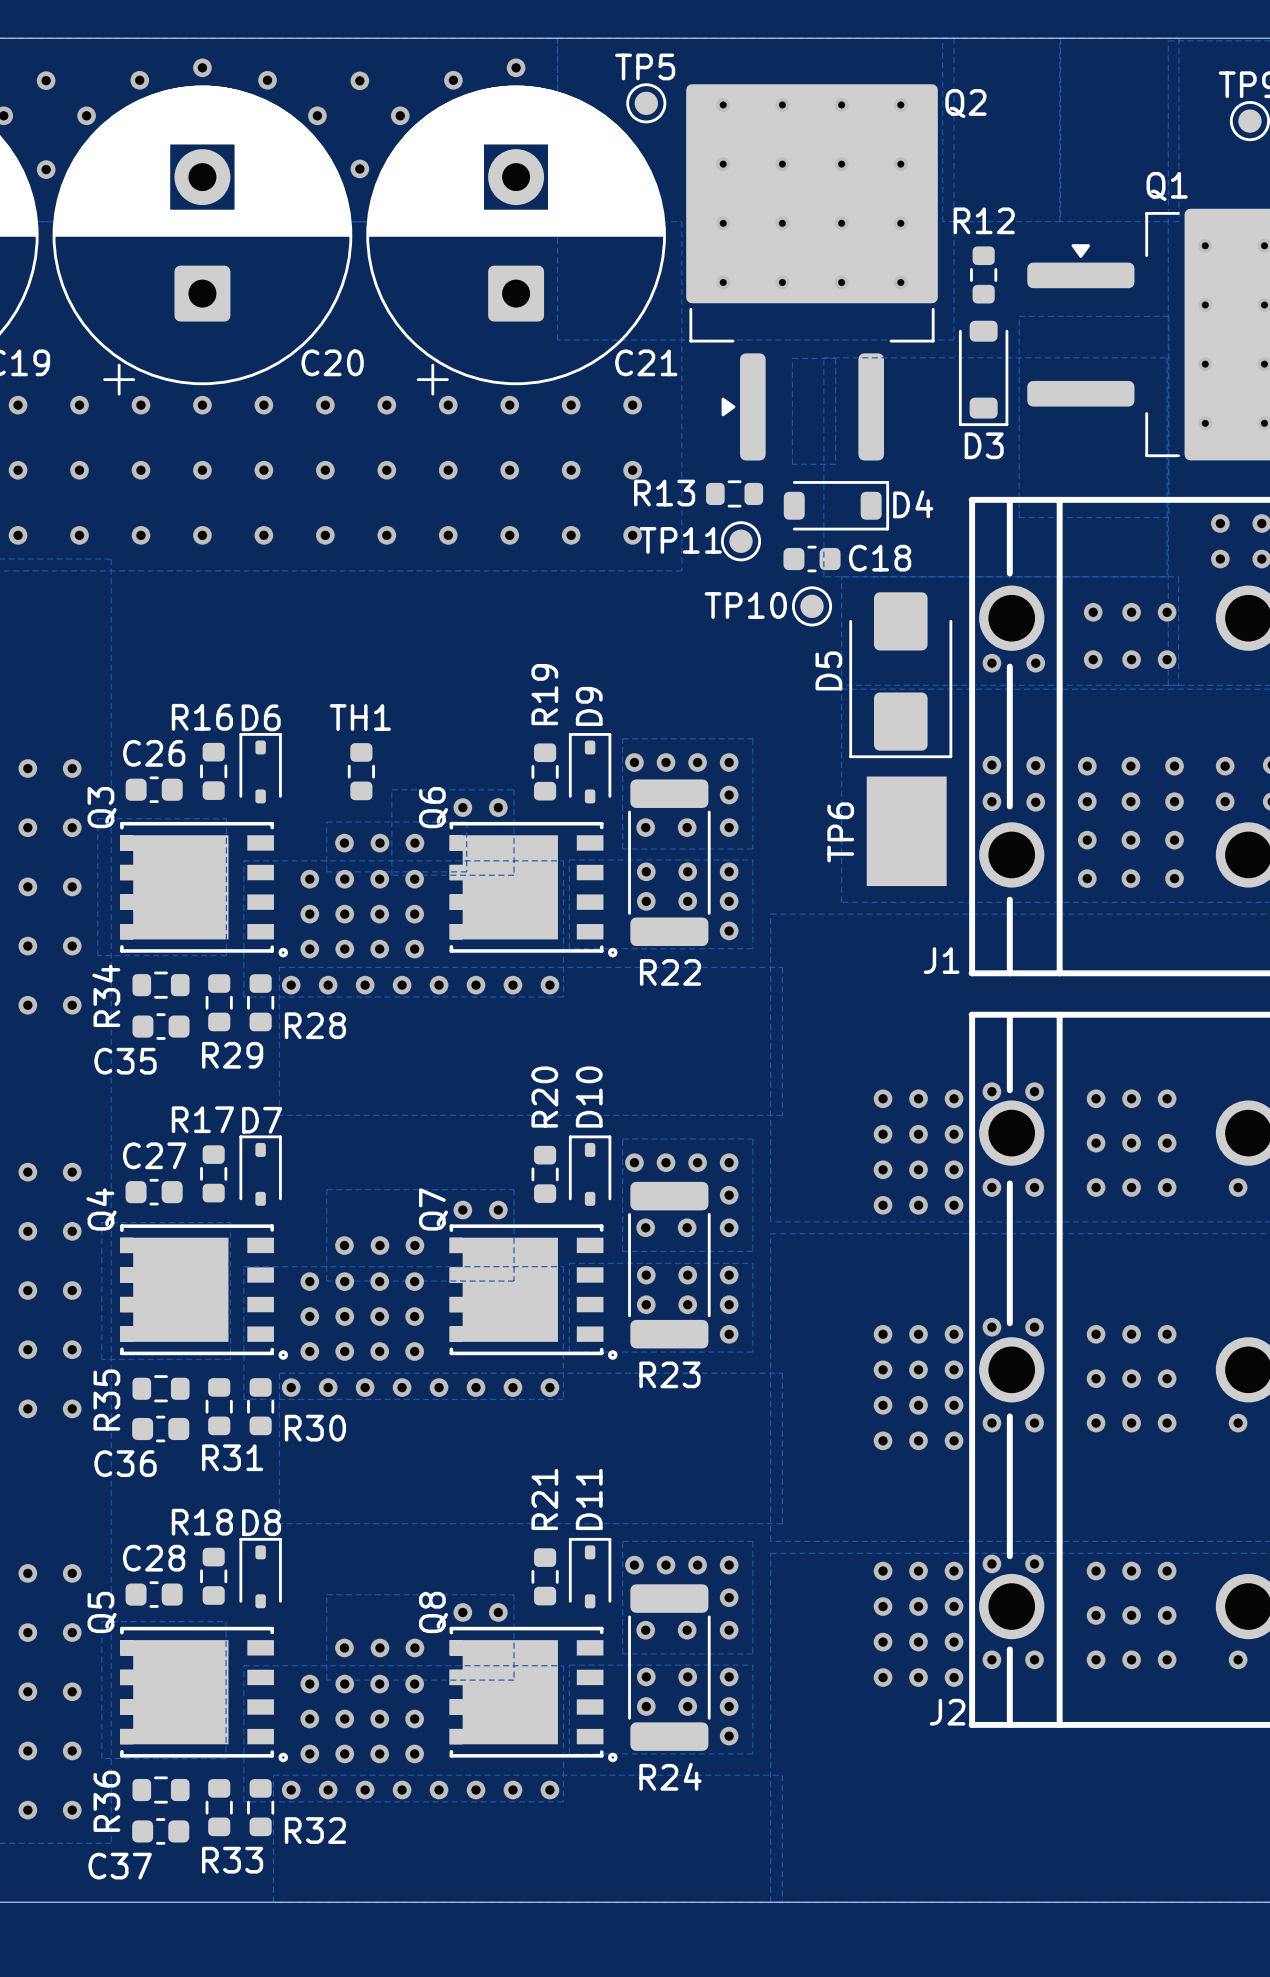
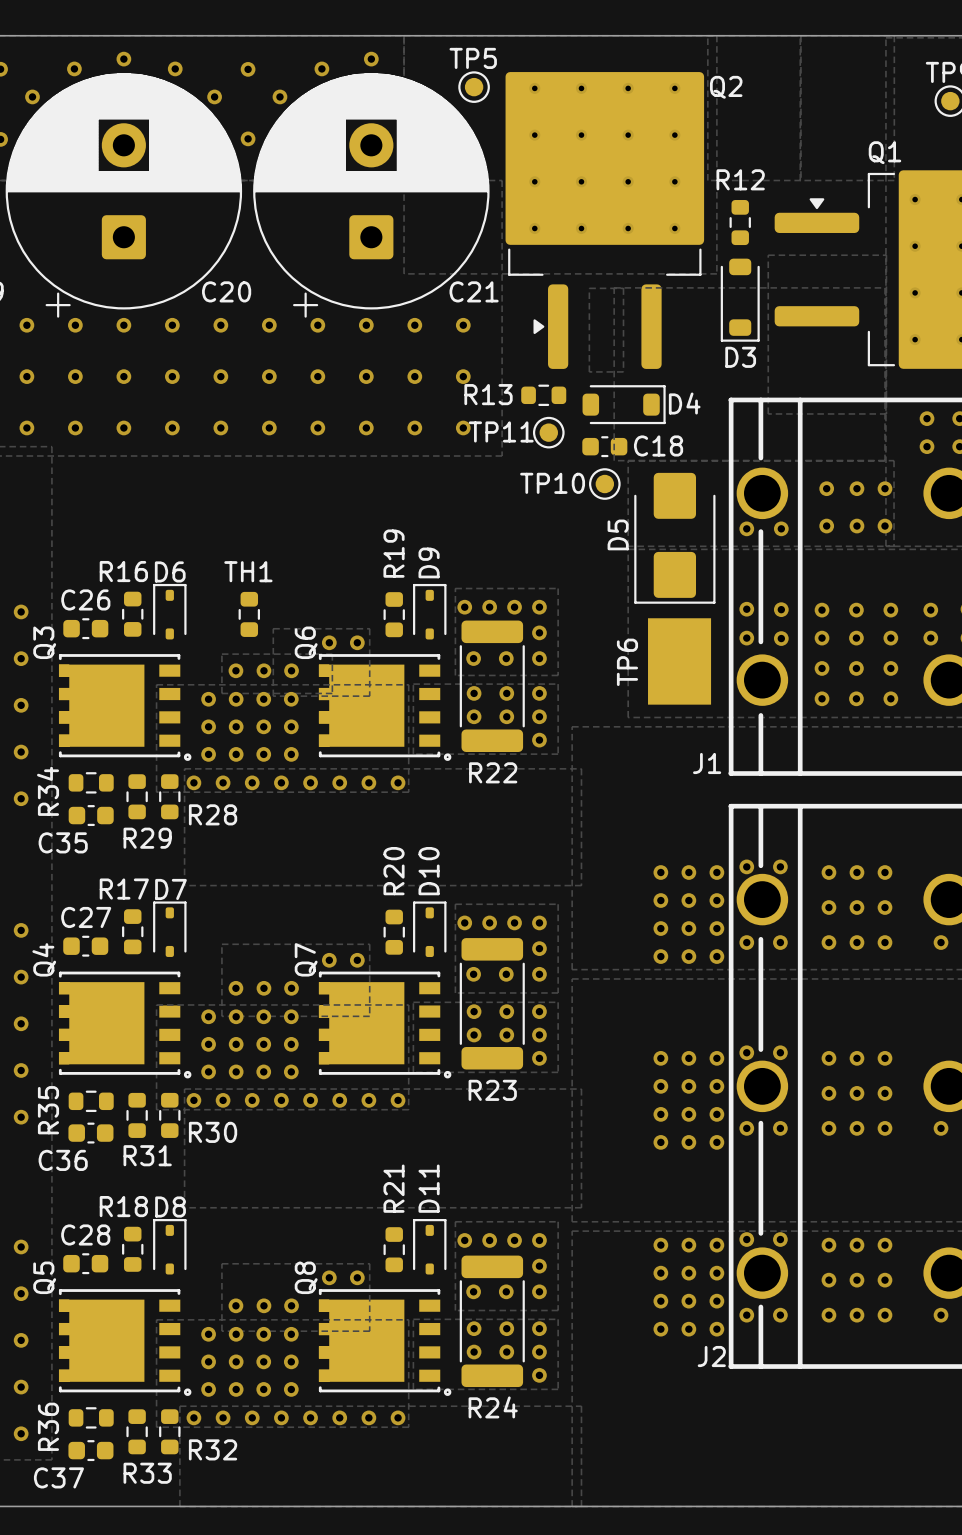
zone outline: (97, 818) (97, 955) (226, 955) (226, 818) (97, 818) -> none
zone outline: (101, 1222) (101, 1359) (230, 1359) (230, 1222) (101, 1222) -> none
zone outline: (101, 1621) (101, 1758) (226, 1758) (226, 1621) (101, 1621) -> none

